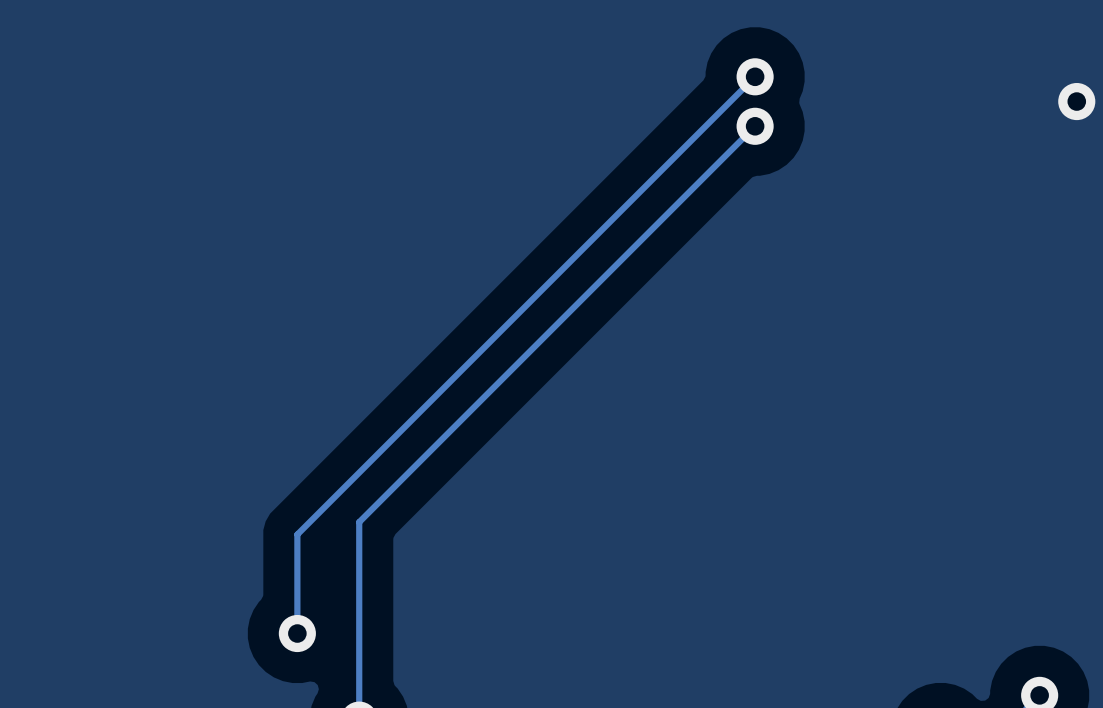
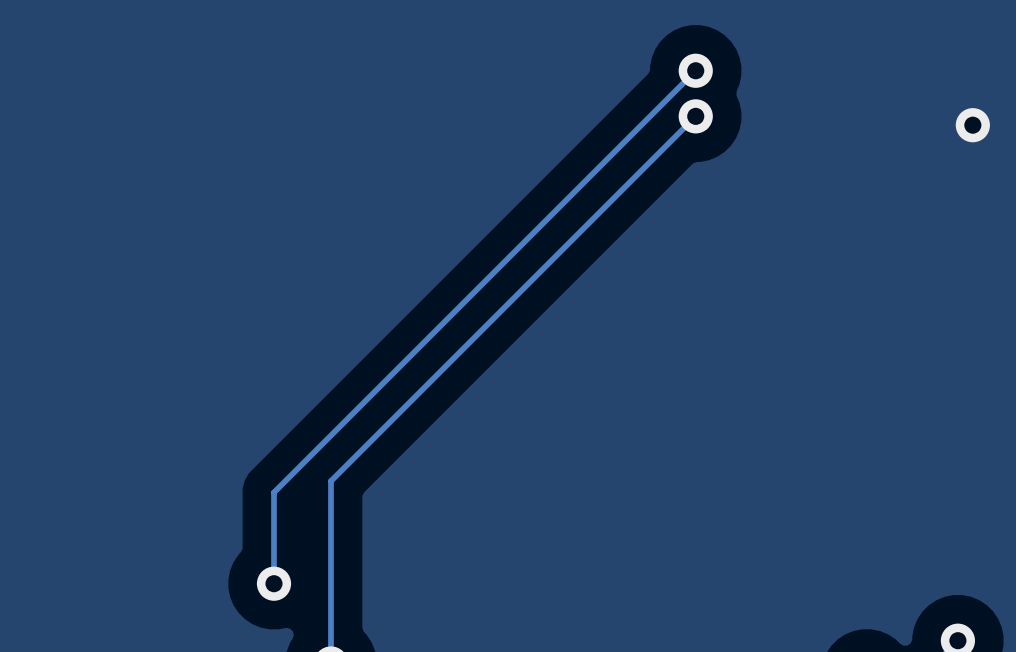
via position: (1076, 101) -> (972, 125)

